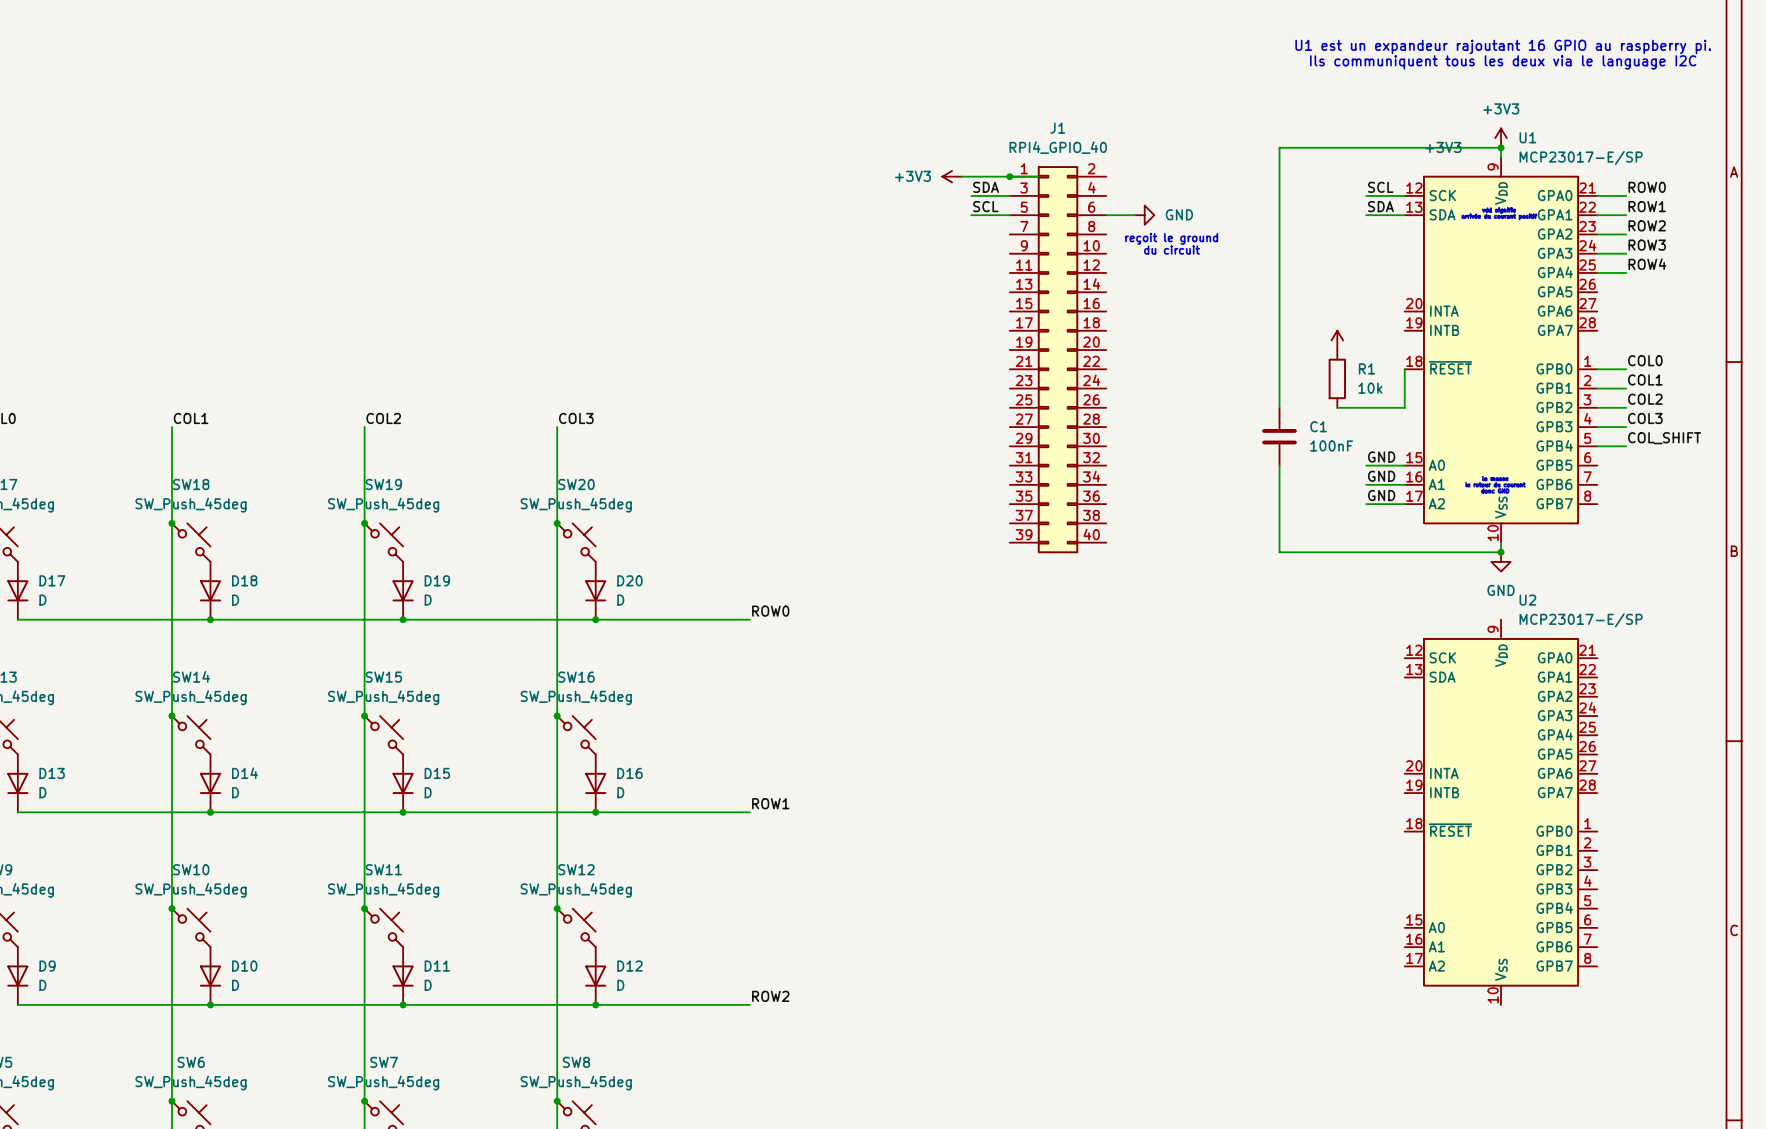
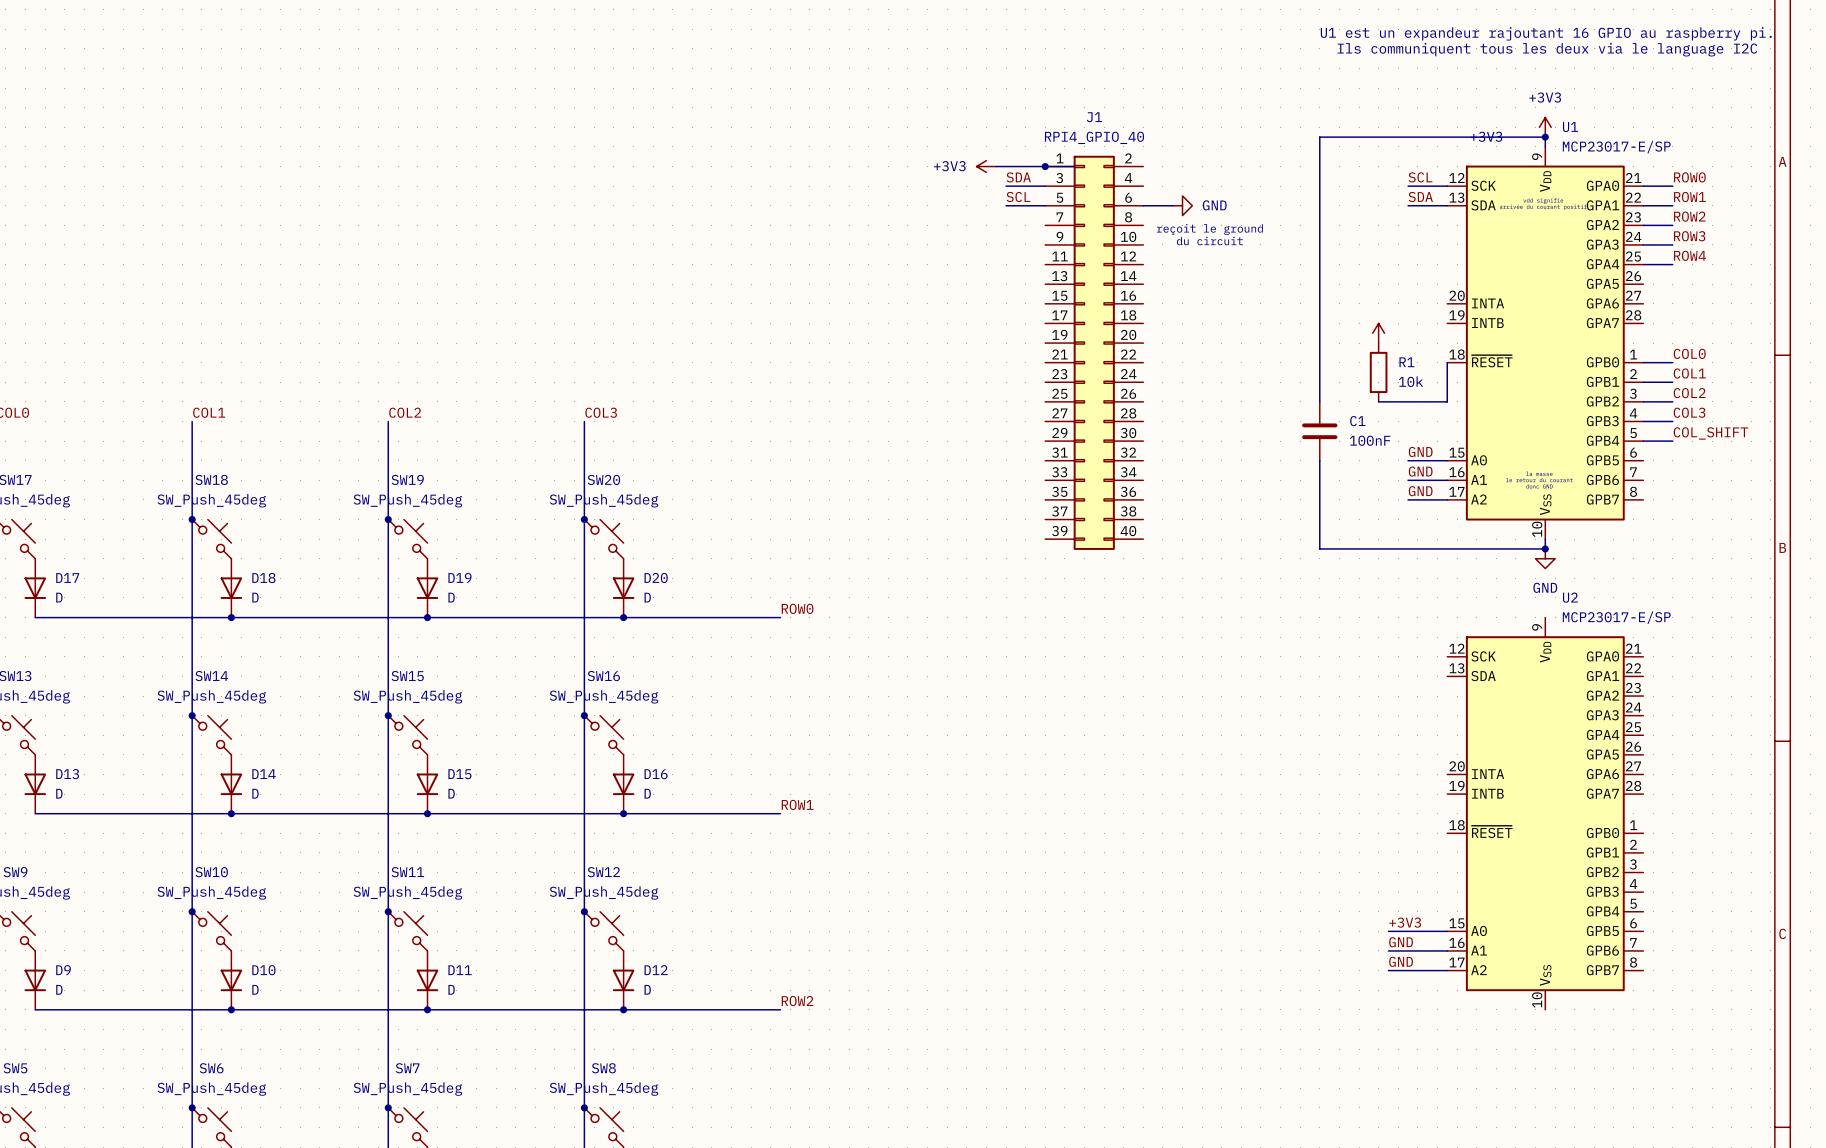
label: none -> +3V3 (1405, 922)
wire: none -> (1388, 931) (1447, 931)
label: none -> GND (1401, 942)
wire: none -> (1388, 950) (1447, 950)
label: none -> GND (1401, 961)
wire: none -> (1388, 970) (1447, 970)

